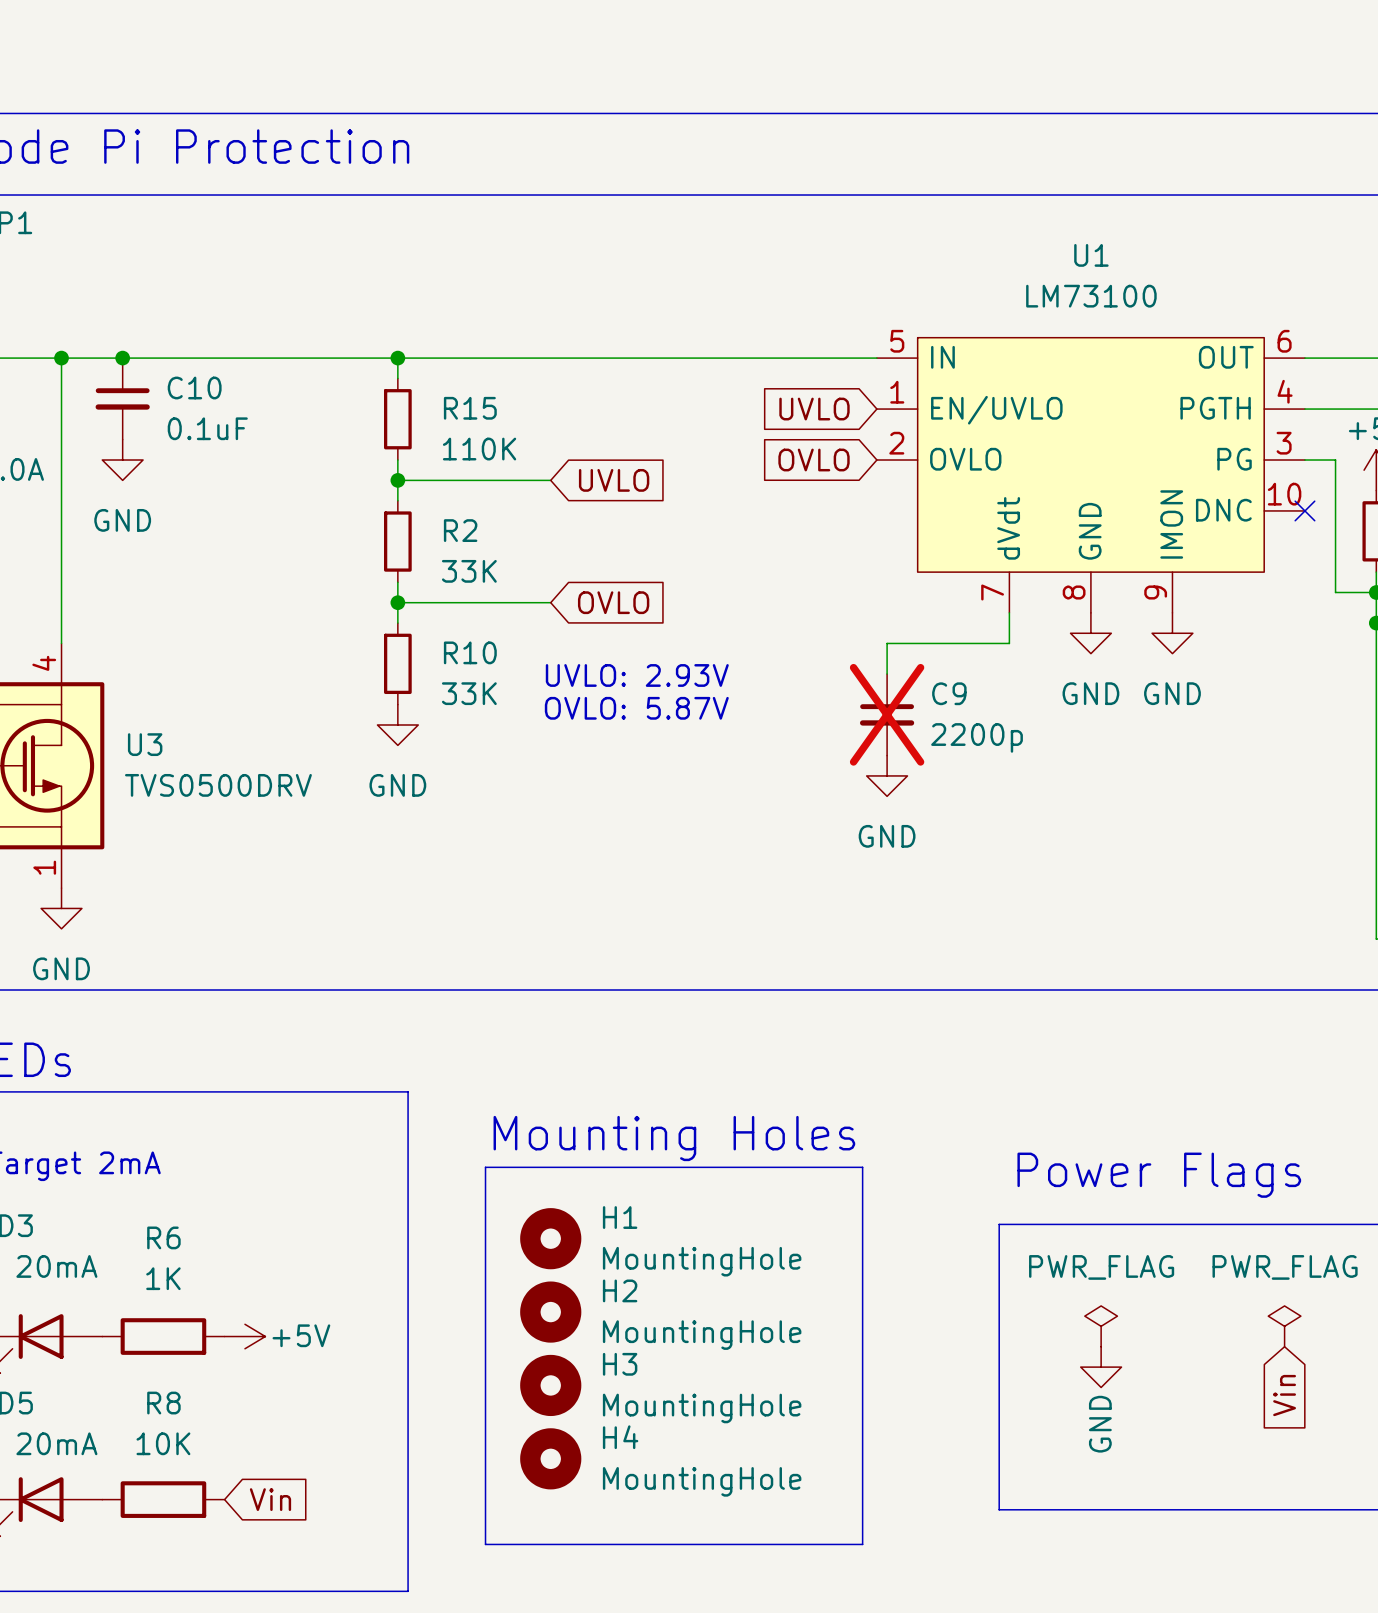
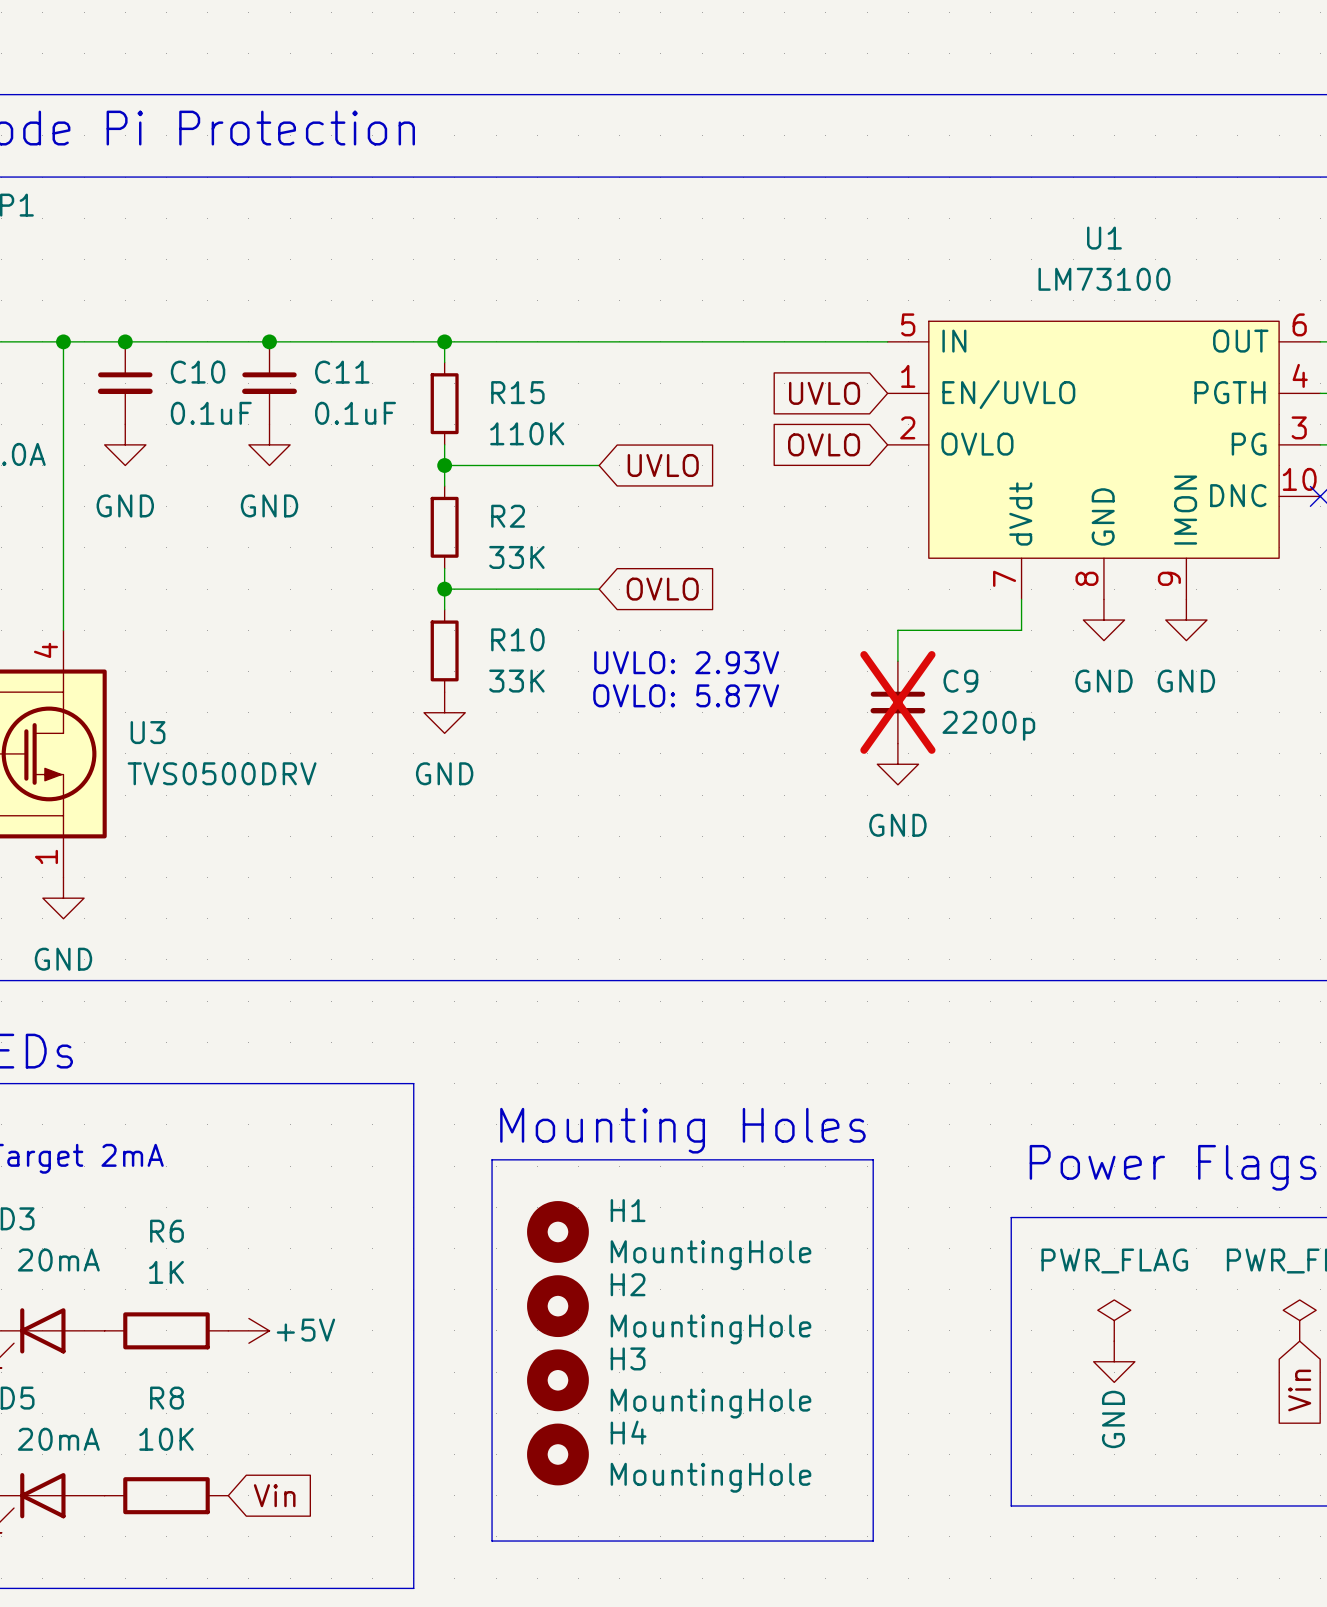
junction: none -> (269, 341)
wire: (397, 358) (397, 378) -> (444, 341) (444, 362)
junction position: (397, 358) -> (444, 341)
C11: none -> 0.1uF (269, 383)
R15 position: (397, 419) -> (444, 403)
power symbol: none -> GND (269, 444)
wire: (397, 460) (397, 500) -> (444, 444) (444, 486)
wire: (397, 480) (438, 480) -> (557, 465) (599, 465)
junction position: (397, 480) -> (444, 465)
global label position: UVLO (614, 480) -> UVLO (663, 465)
R2 position: (397, 541) -> (444, 527)
wire: (397, 582) (397, 623) -> (444, 568) (444, 609)
wire: (397, 602) (438, 602) -> (557, 589) (599, 589)
junction position: (397, 602) -> (444, 589)
global label position: OVLO (613, 602) -> OVLO (662, 589)
R10 position: (397, 663) -> (444, 650)
text position: UVLO: 2.93V (637, 675) -> UVLO: 2.93V (686, 662)
text position: OVLO: 5.87V (636, 708) -> OVLO: 5.87V (686, 695)
power symbol position: GND (397, 725) -> GND (444, 712)

